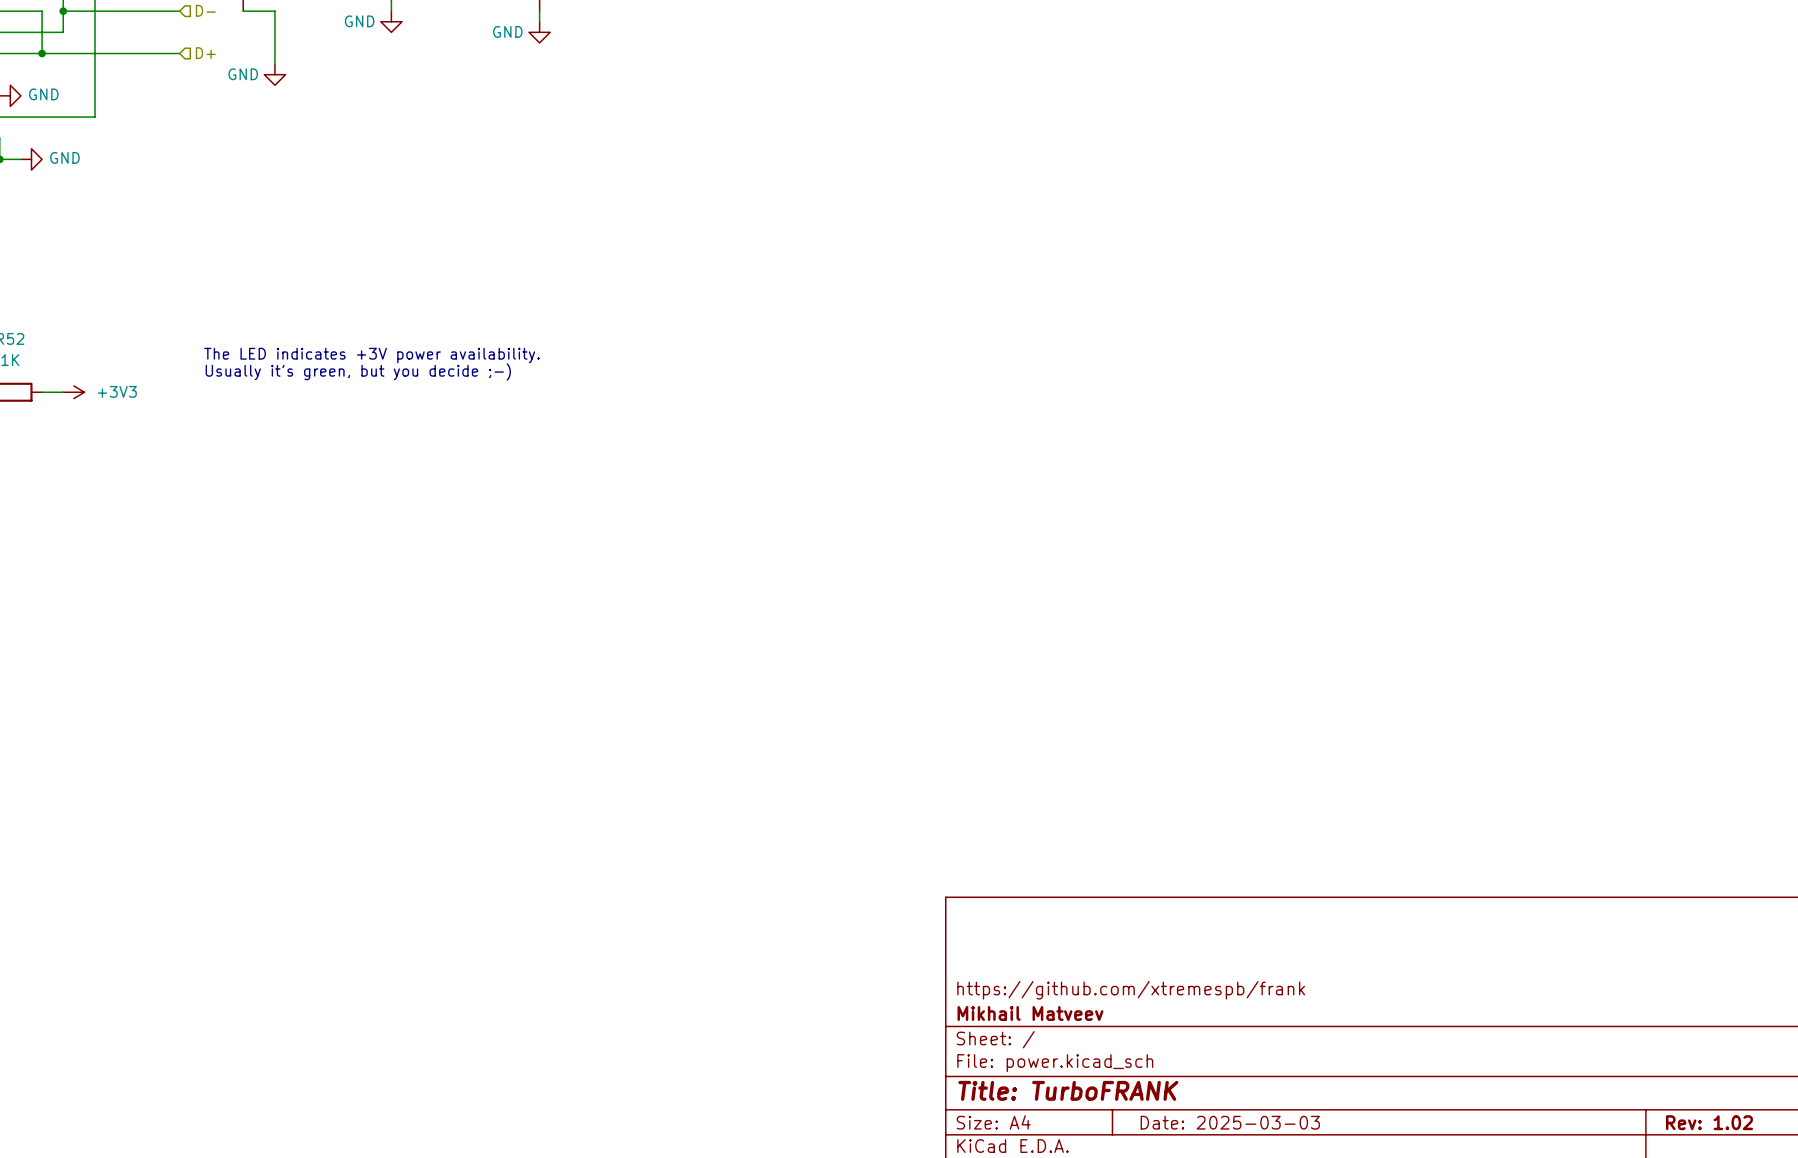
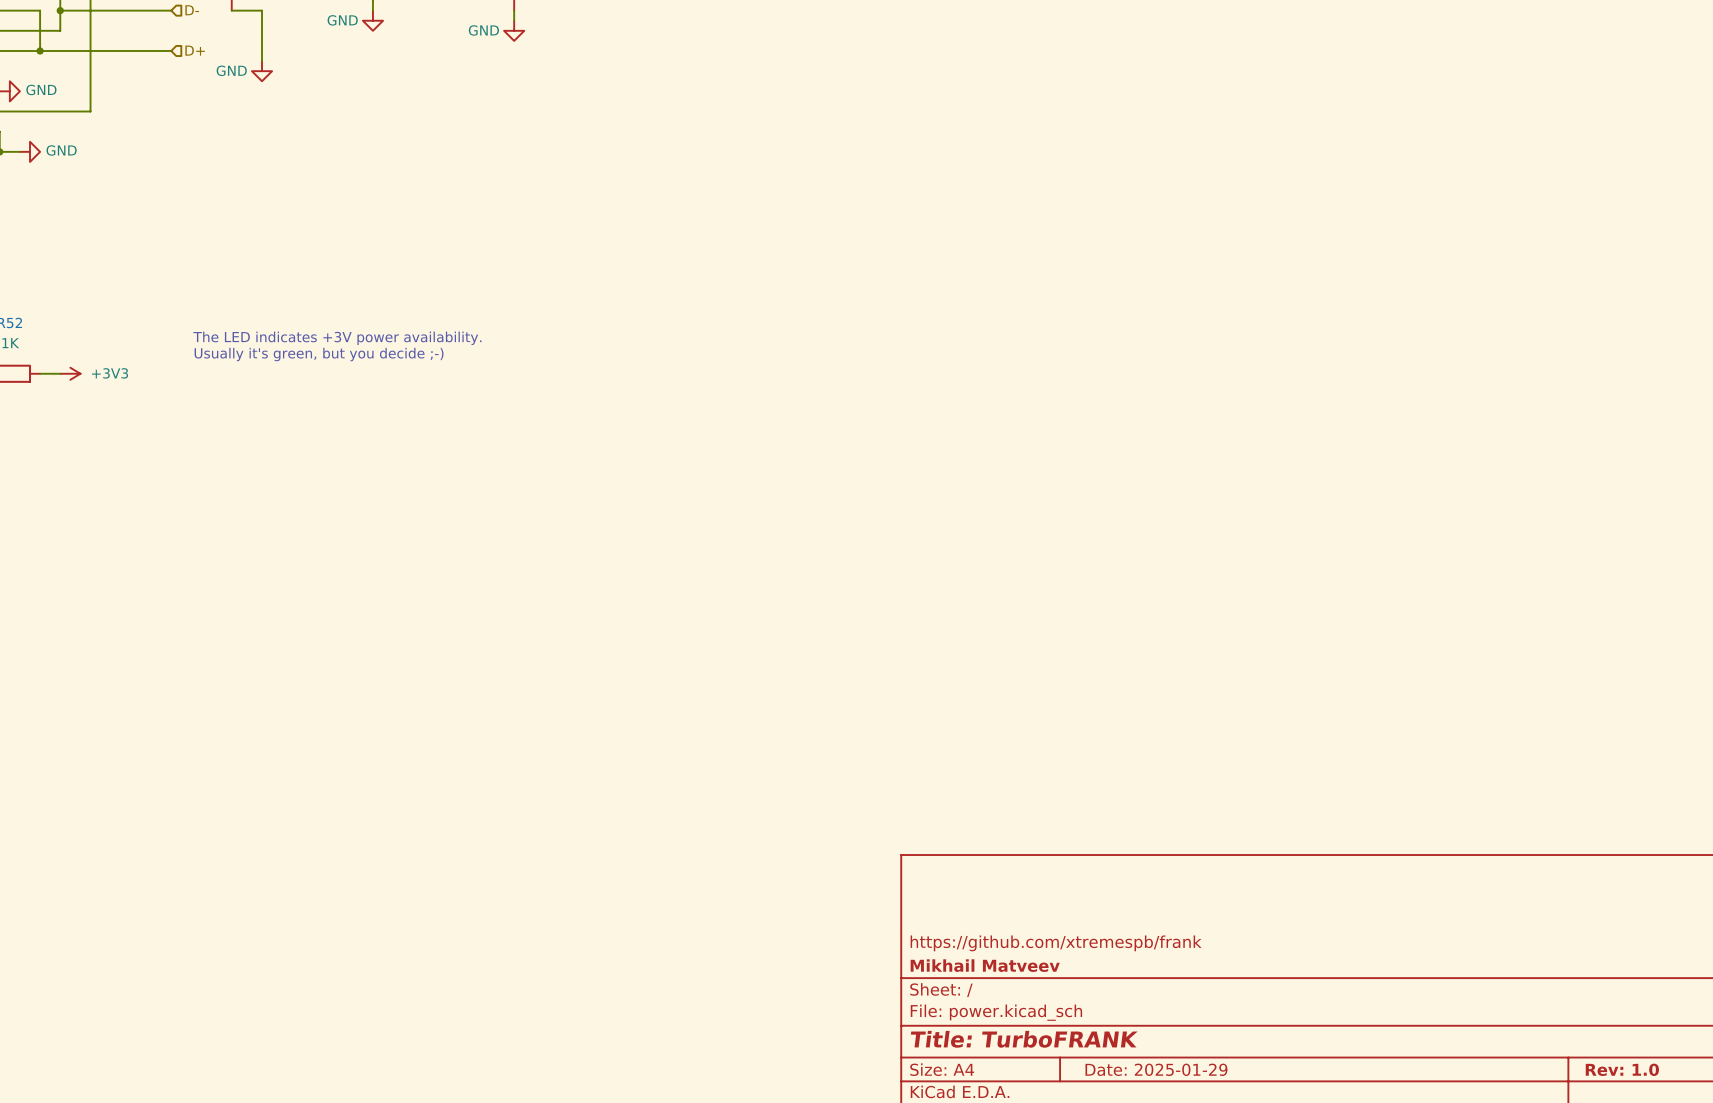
title block: Date: 2025-03-03 (1230, 1122) -> Date: 2025-01-29 (1156, 1069)
title block: Rev: 1.02 (1709, 1122) -> Rev: 1.0 (1622, 1069)

